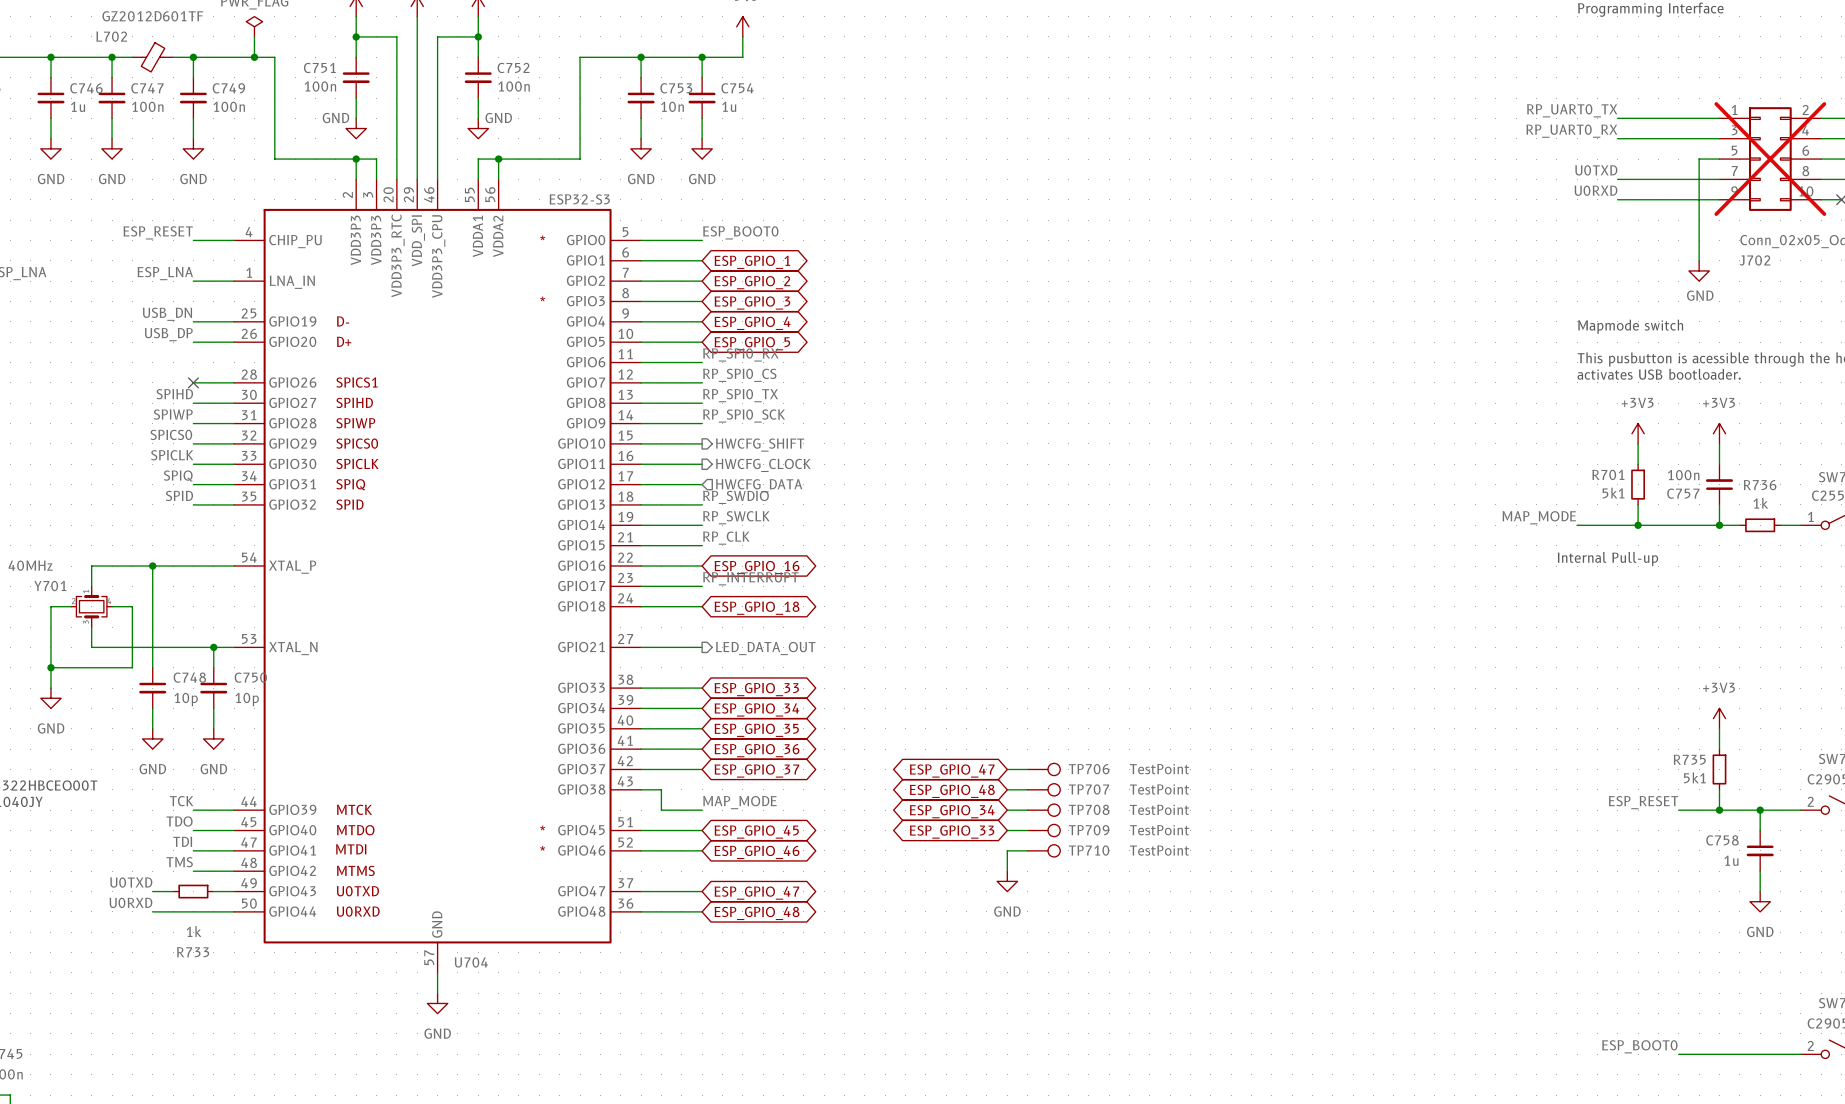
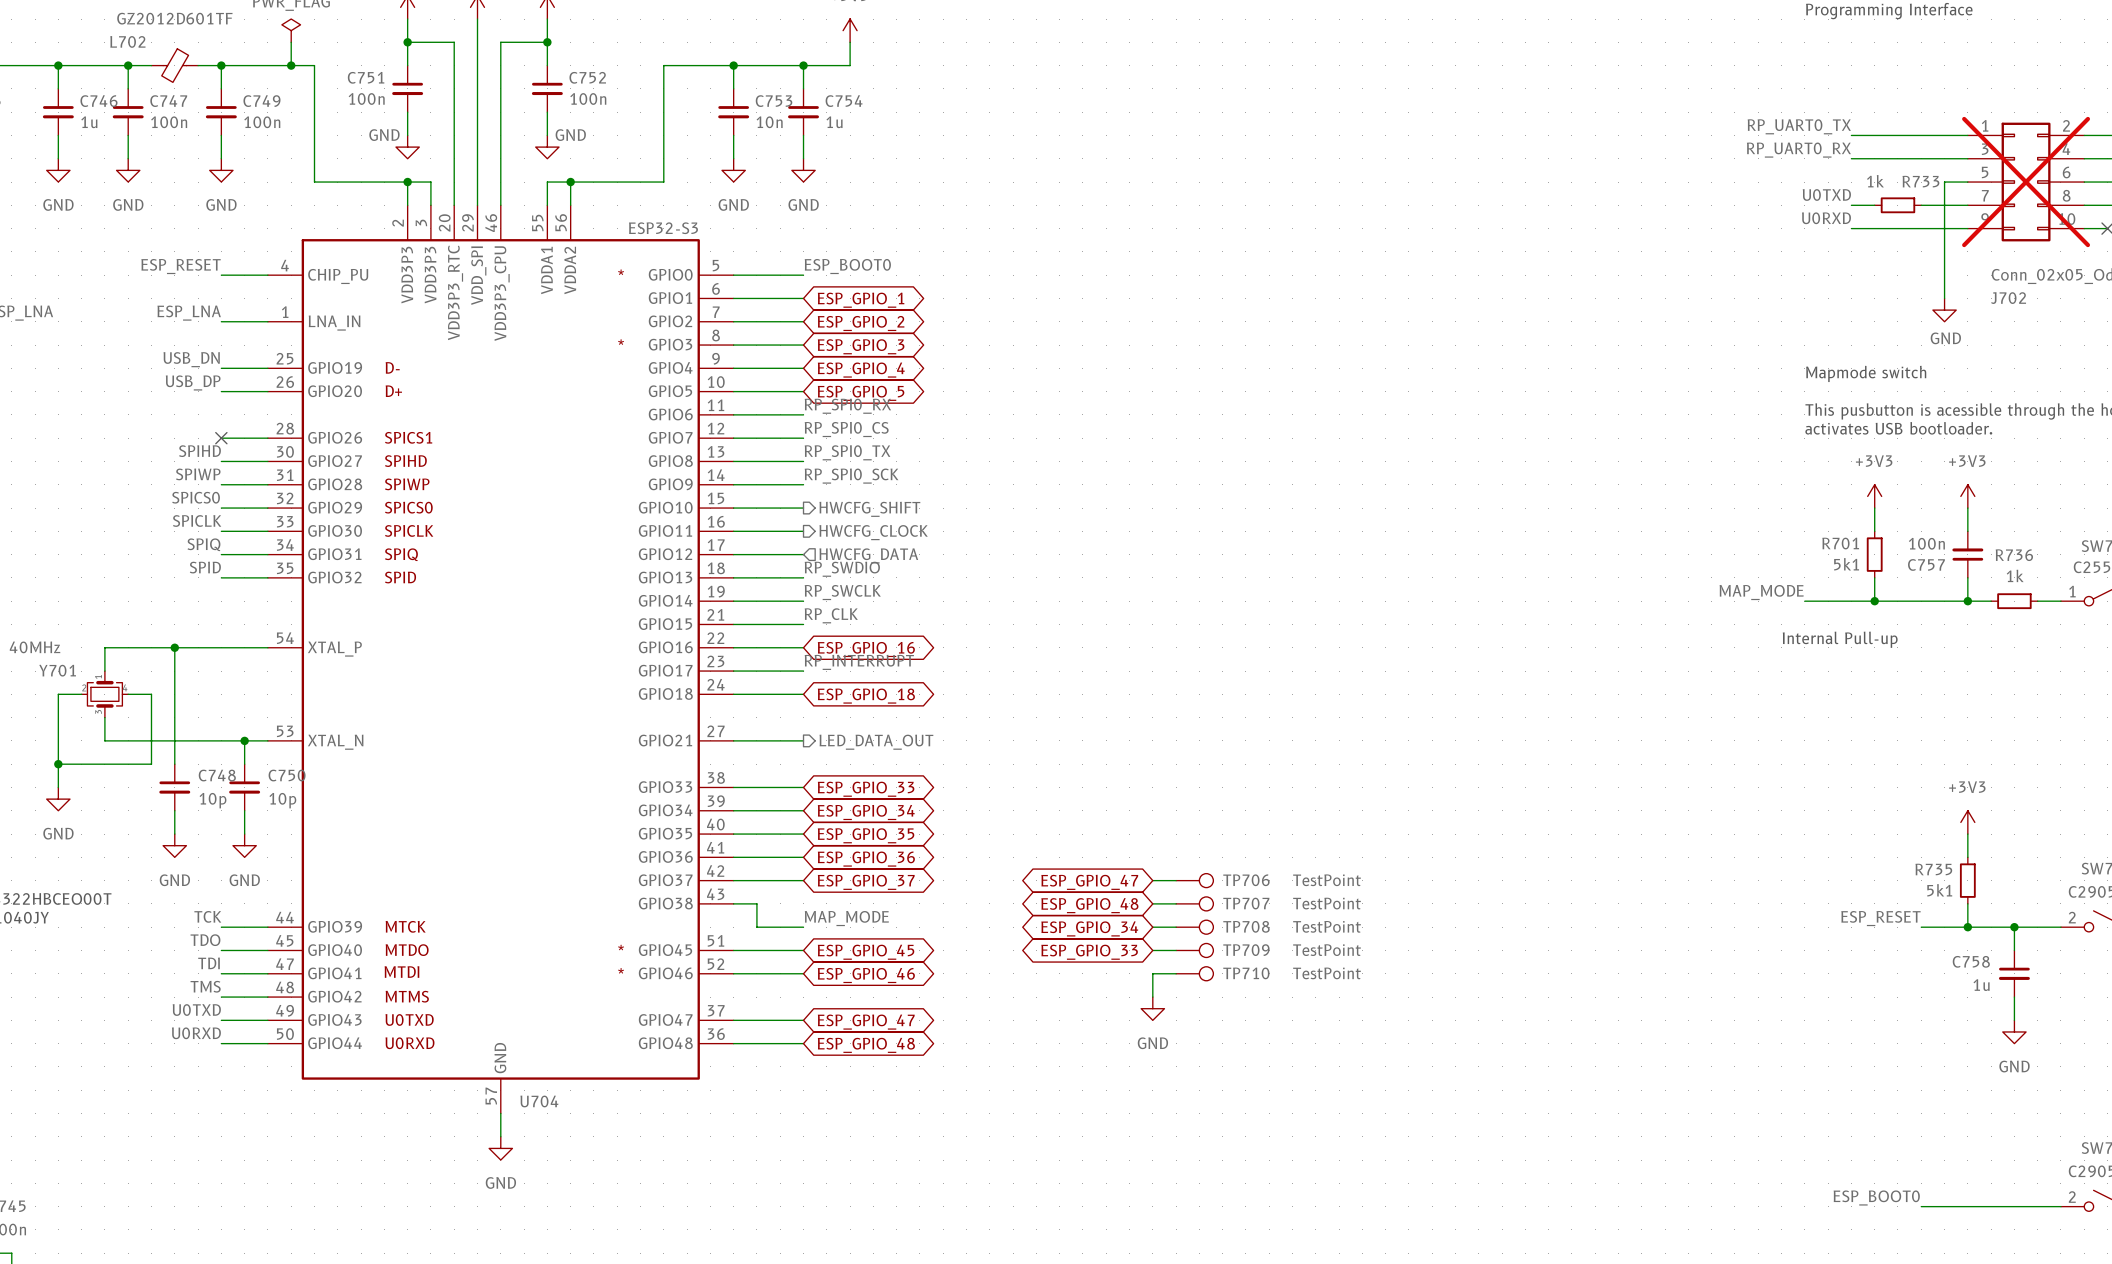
wire: (1638, 179) (1678, 179) -> none
label position: U0TXD (131, 882) -> U0TXD (196, 1010)
wire: (152, 891) (173, 891) -> (221, 1020) (244, 1020)
R733 position: (193, 891) -> (1897, 205)
label position: U0RXD (130, 902) -> U0RXD (196, 1033)
wire: (152, 911) (193, 911) -> none
R733 value position: 1k (194, 931) -> 1k (1875, 181)
R733 name position: R733 (193, 952) -> R733 (1920, 181)

